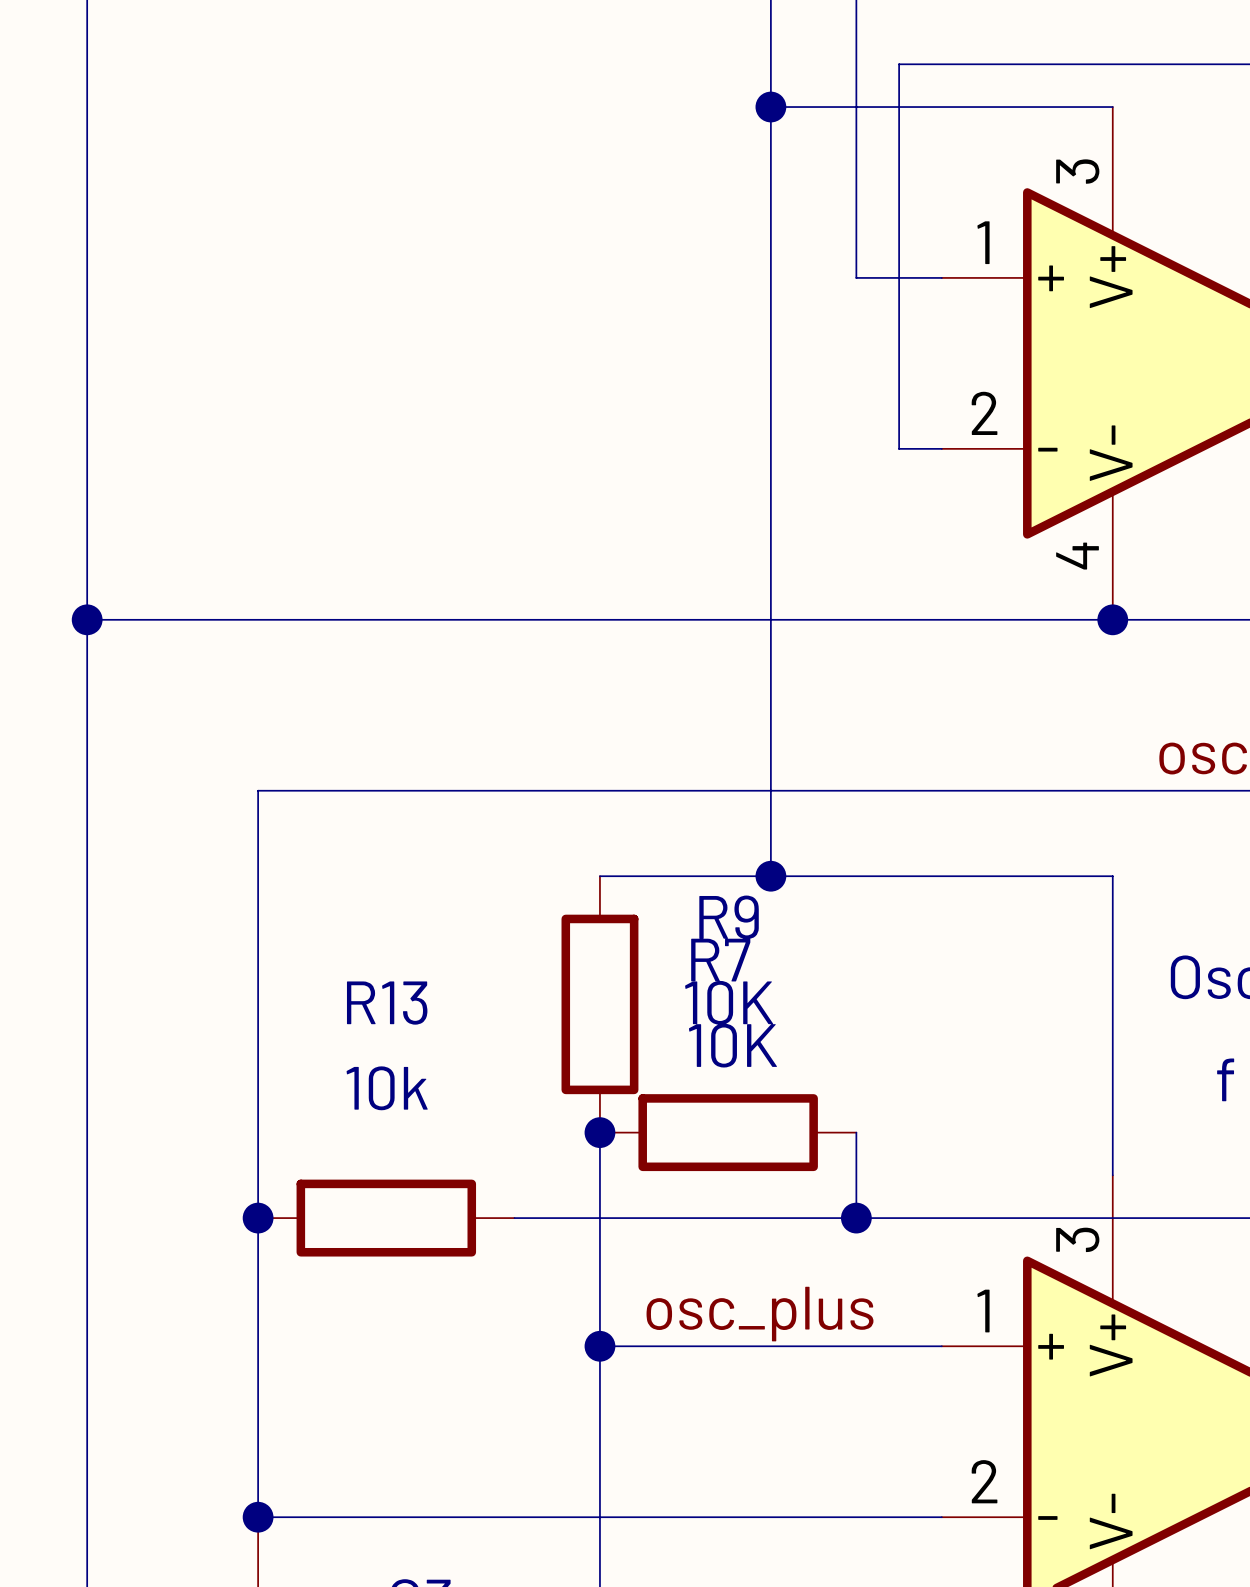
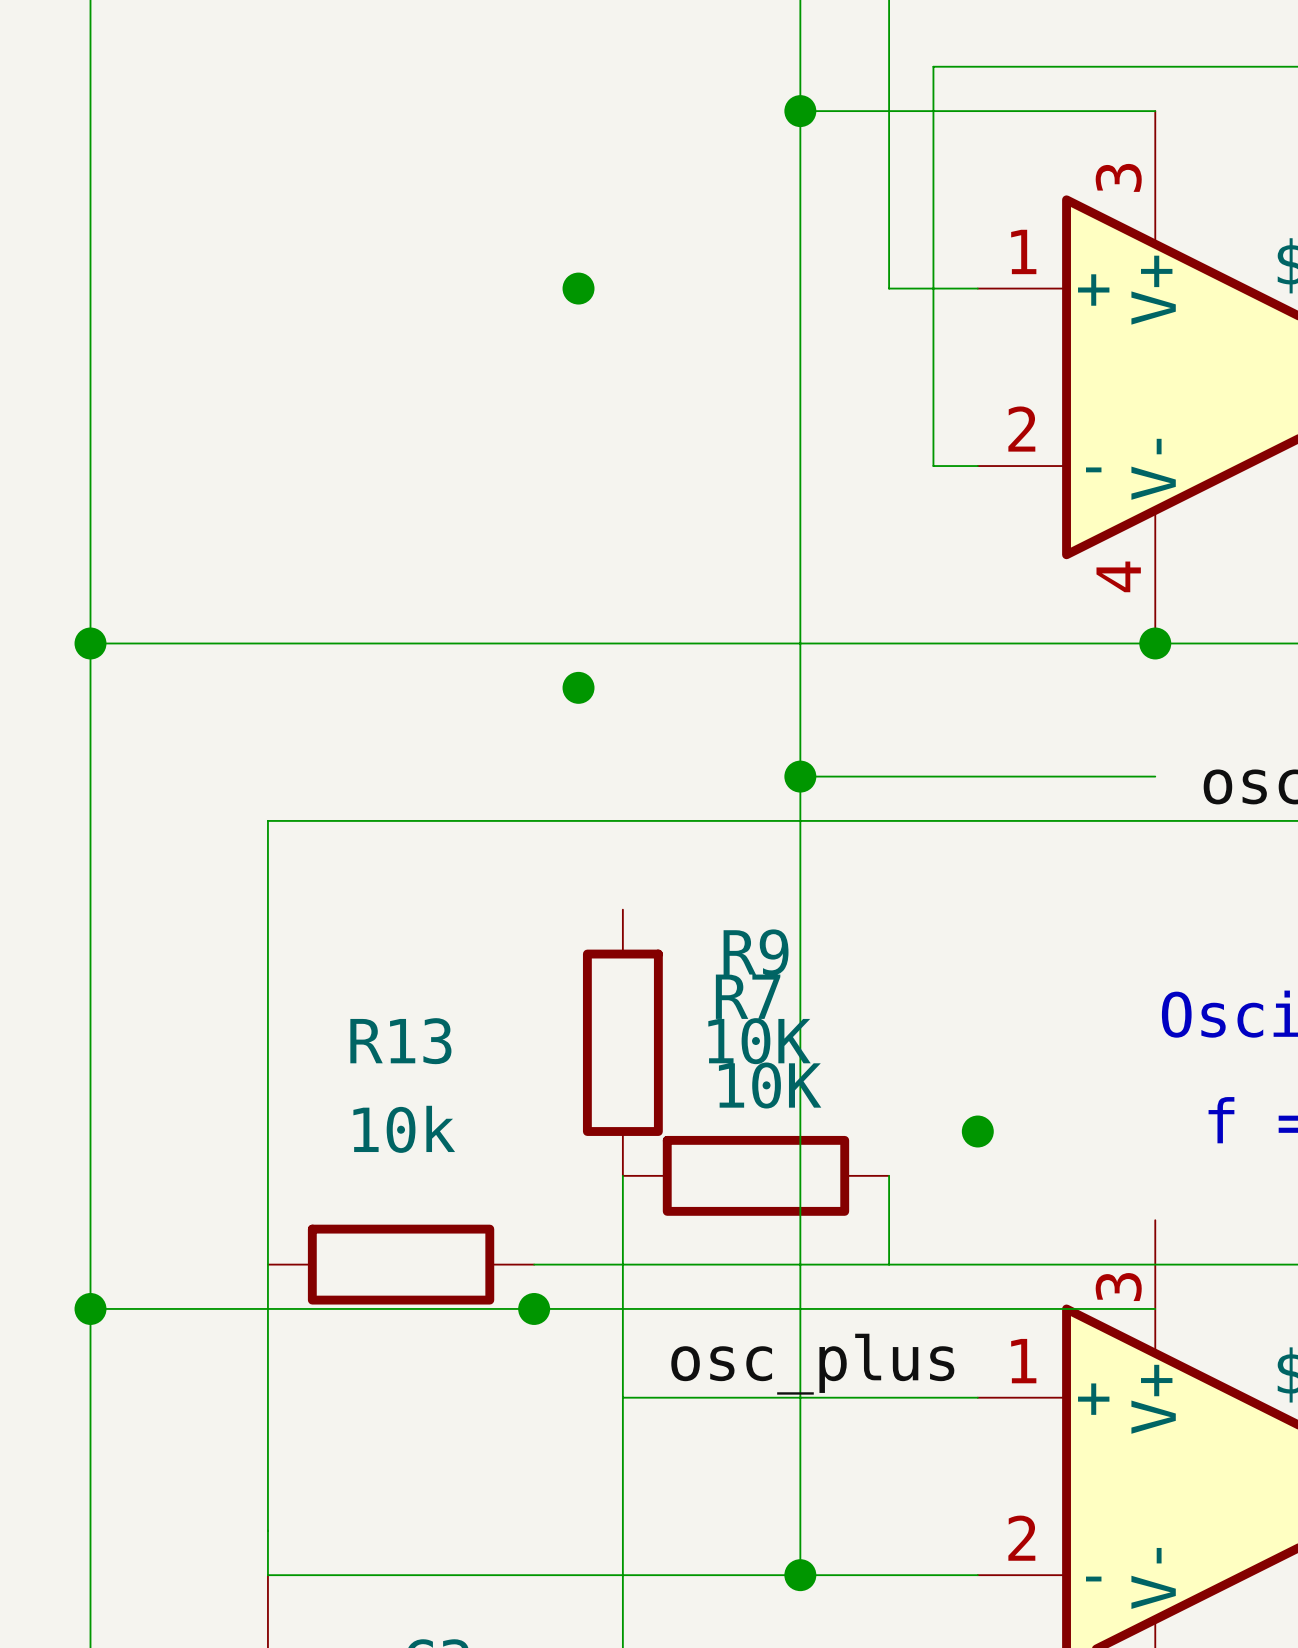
junction: none -> (578, 288)
junction: none -> (578, 687)
wire: none -> (800, 776) (1155, 776)
wire: (599, 876) (1112, 876) (1112, 1175) -> none
wire: none -> (800, 909) (800, 1575)
junction position: (770, 876) -> (800, 776)
junction: none -> (977, 1131)
junction: (599, 1132) -> none
junction: (258, 1218) -> none
junction: (856, 1218) -> none
wire: none -> (90, 1308) (1155, 1308)
junction: none -> (90, 1308)
junction: none -> (534, 1308)
junction: (599, 1346) -> none
junction: (258, 1517) -> none
junction: none -> (800, 1575)

